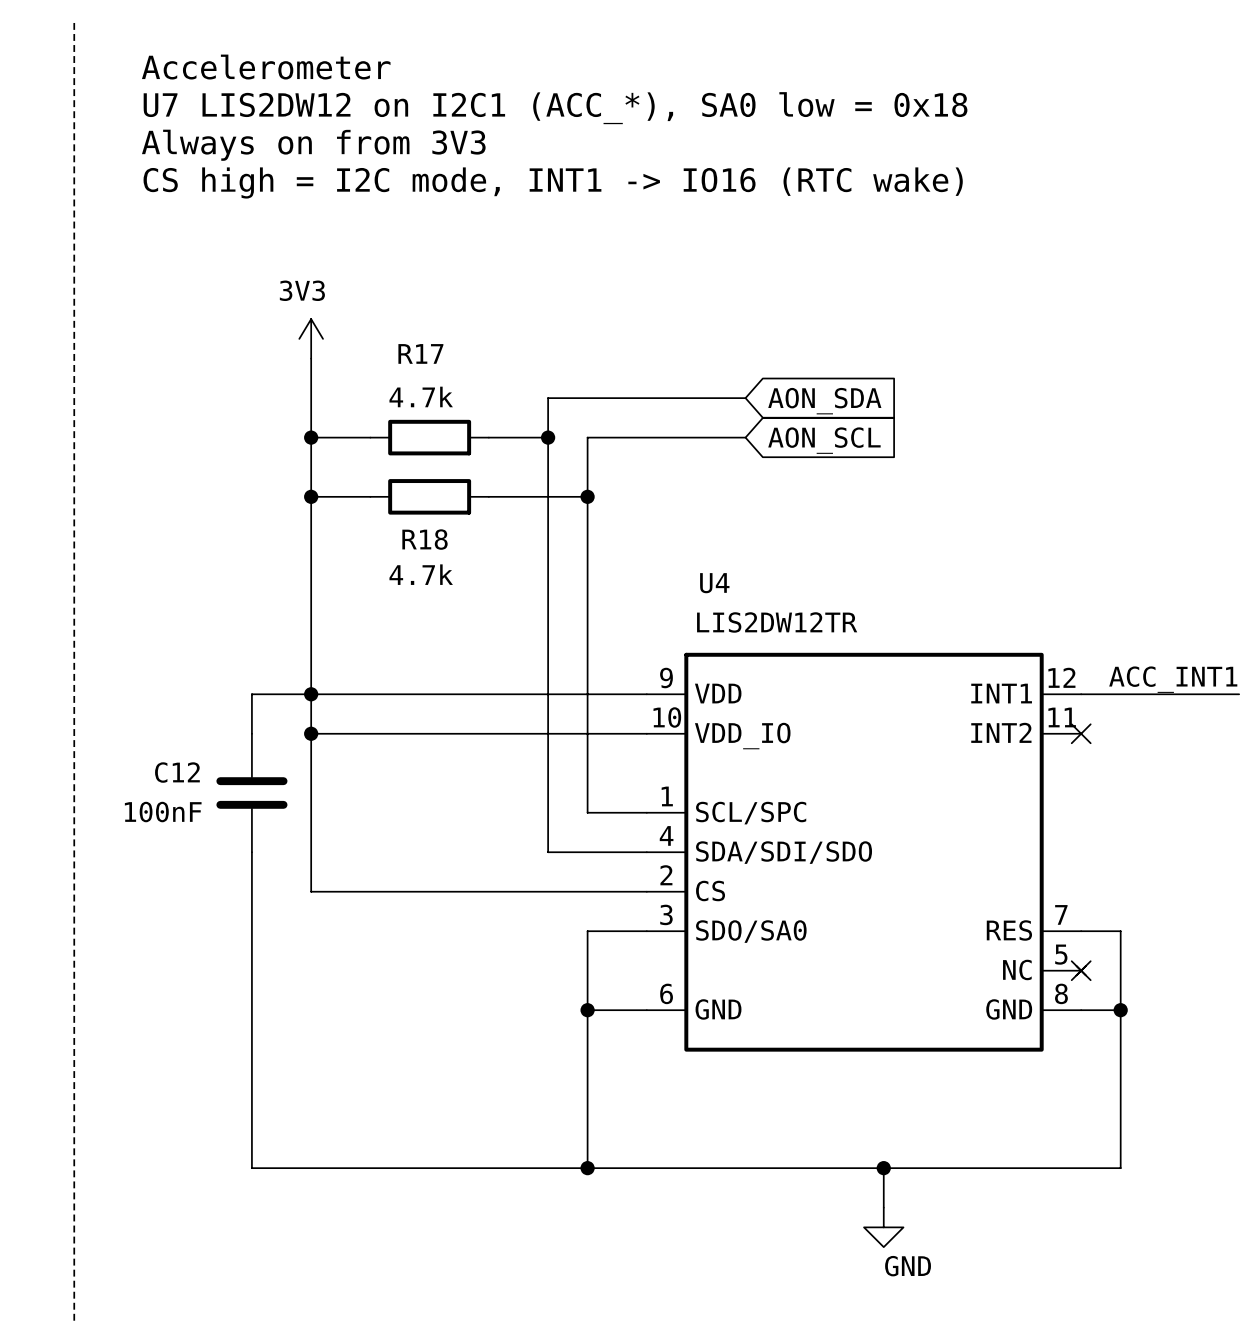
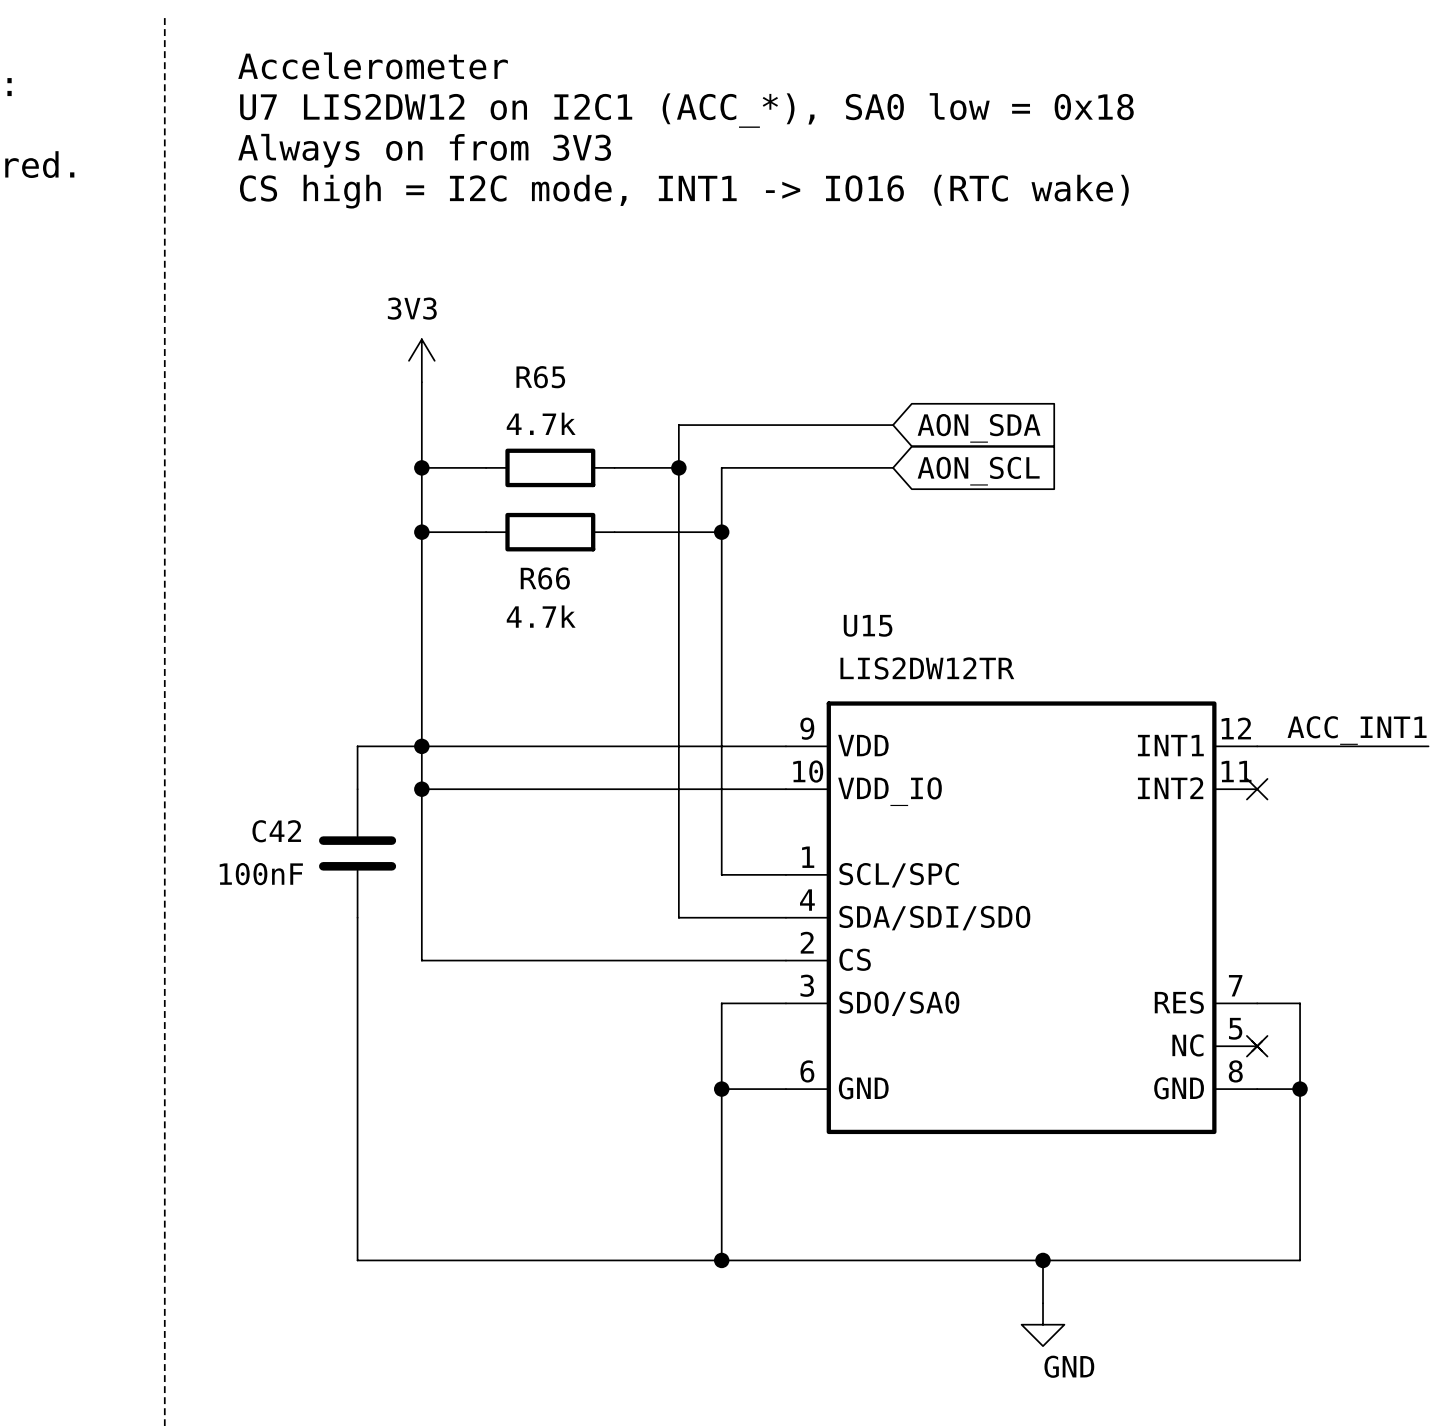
R17 name: R17 (420, 353) -> R65 (540, 377)
R18 name: R18 (425, 539) -> R66 (545, 578)
U4 name: U4 (714, 583) -> U15 (868, 625)
C12 name: C12 (177, 772) -> C42 (276, 831)

